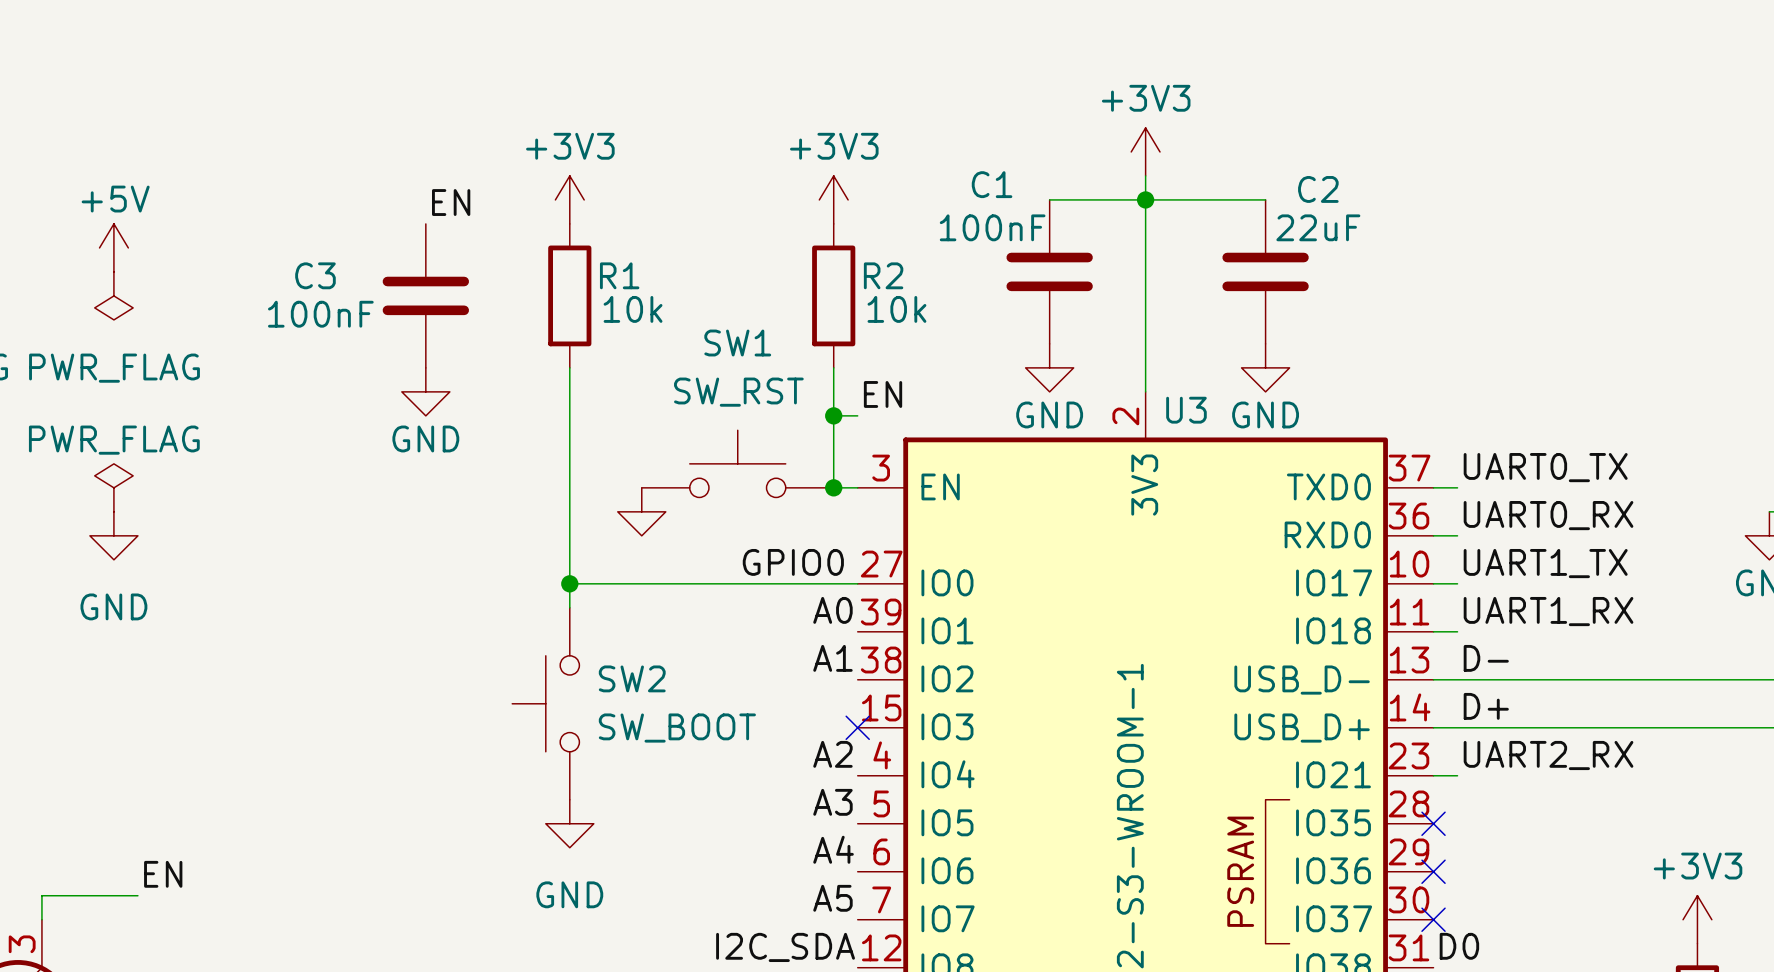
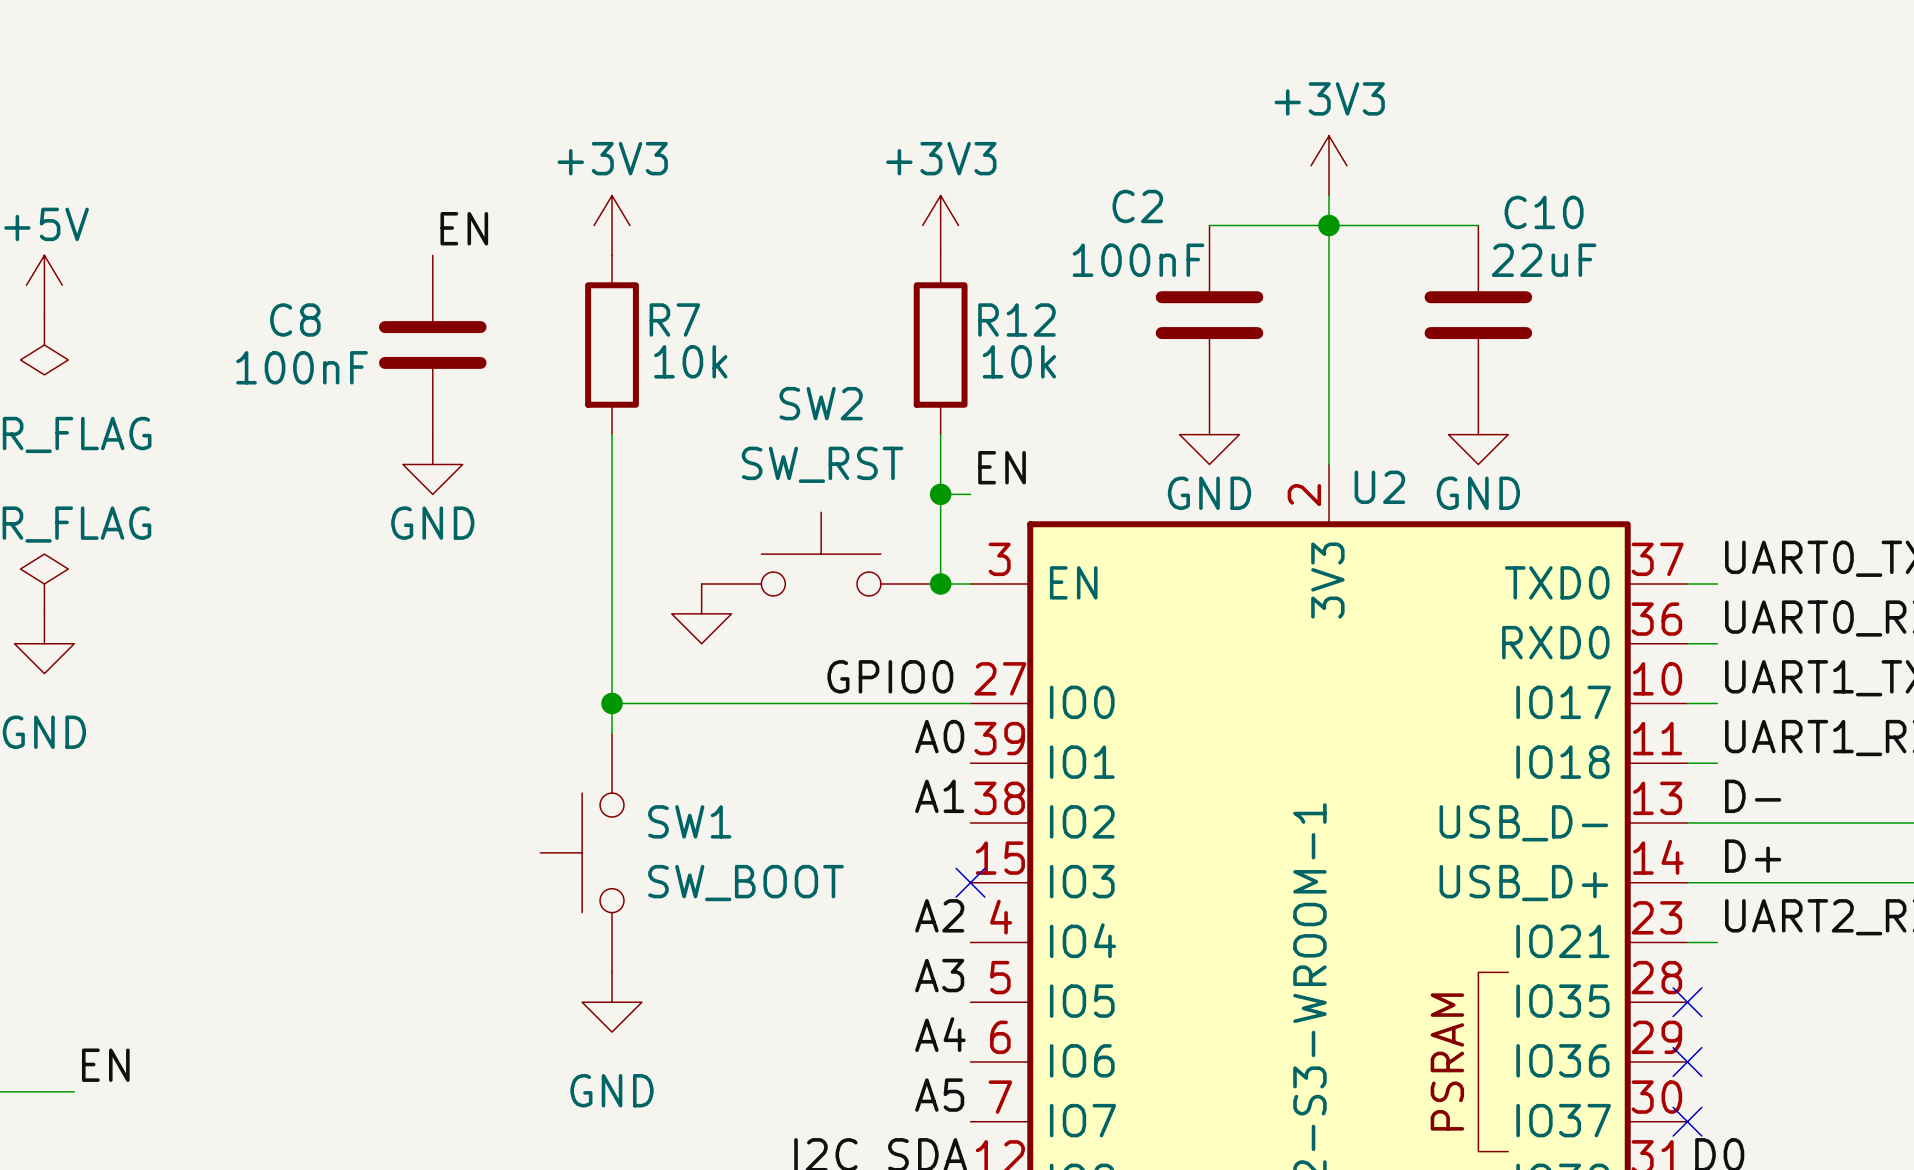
C1 name: C1 (992, 184) -> C2 (1137, 206)
C2 name: C2 (1318, 189) -> C10 (1544, 212)
C3 name: C3 (315, 275) -> C8 (295, 319)
R1 name: R1 (619, 275) -> R7 (674, 319)
R2 name: R2 (883, 275) -> R12 (1016, 319)
SW1 name: SW1 (737, 343) -> SW2 (821, 403)
U3 name: U3 (1186, 410) -> U2 (1379, 487)
SW2 name: SW2 (632, 678) -> SW1 (689, 821)

